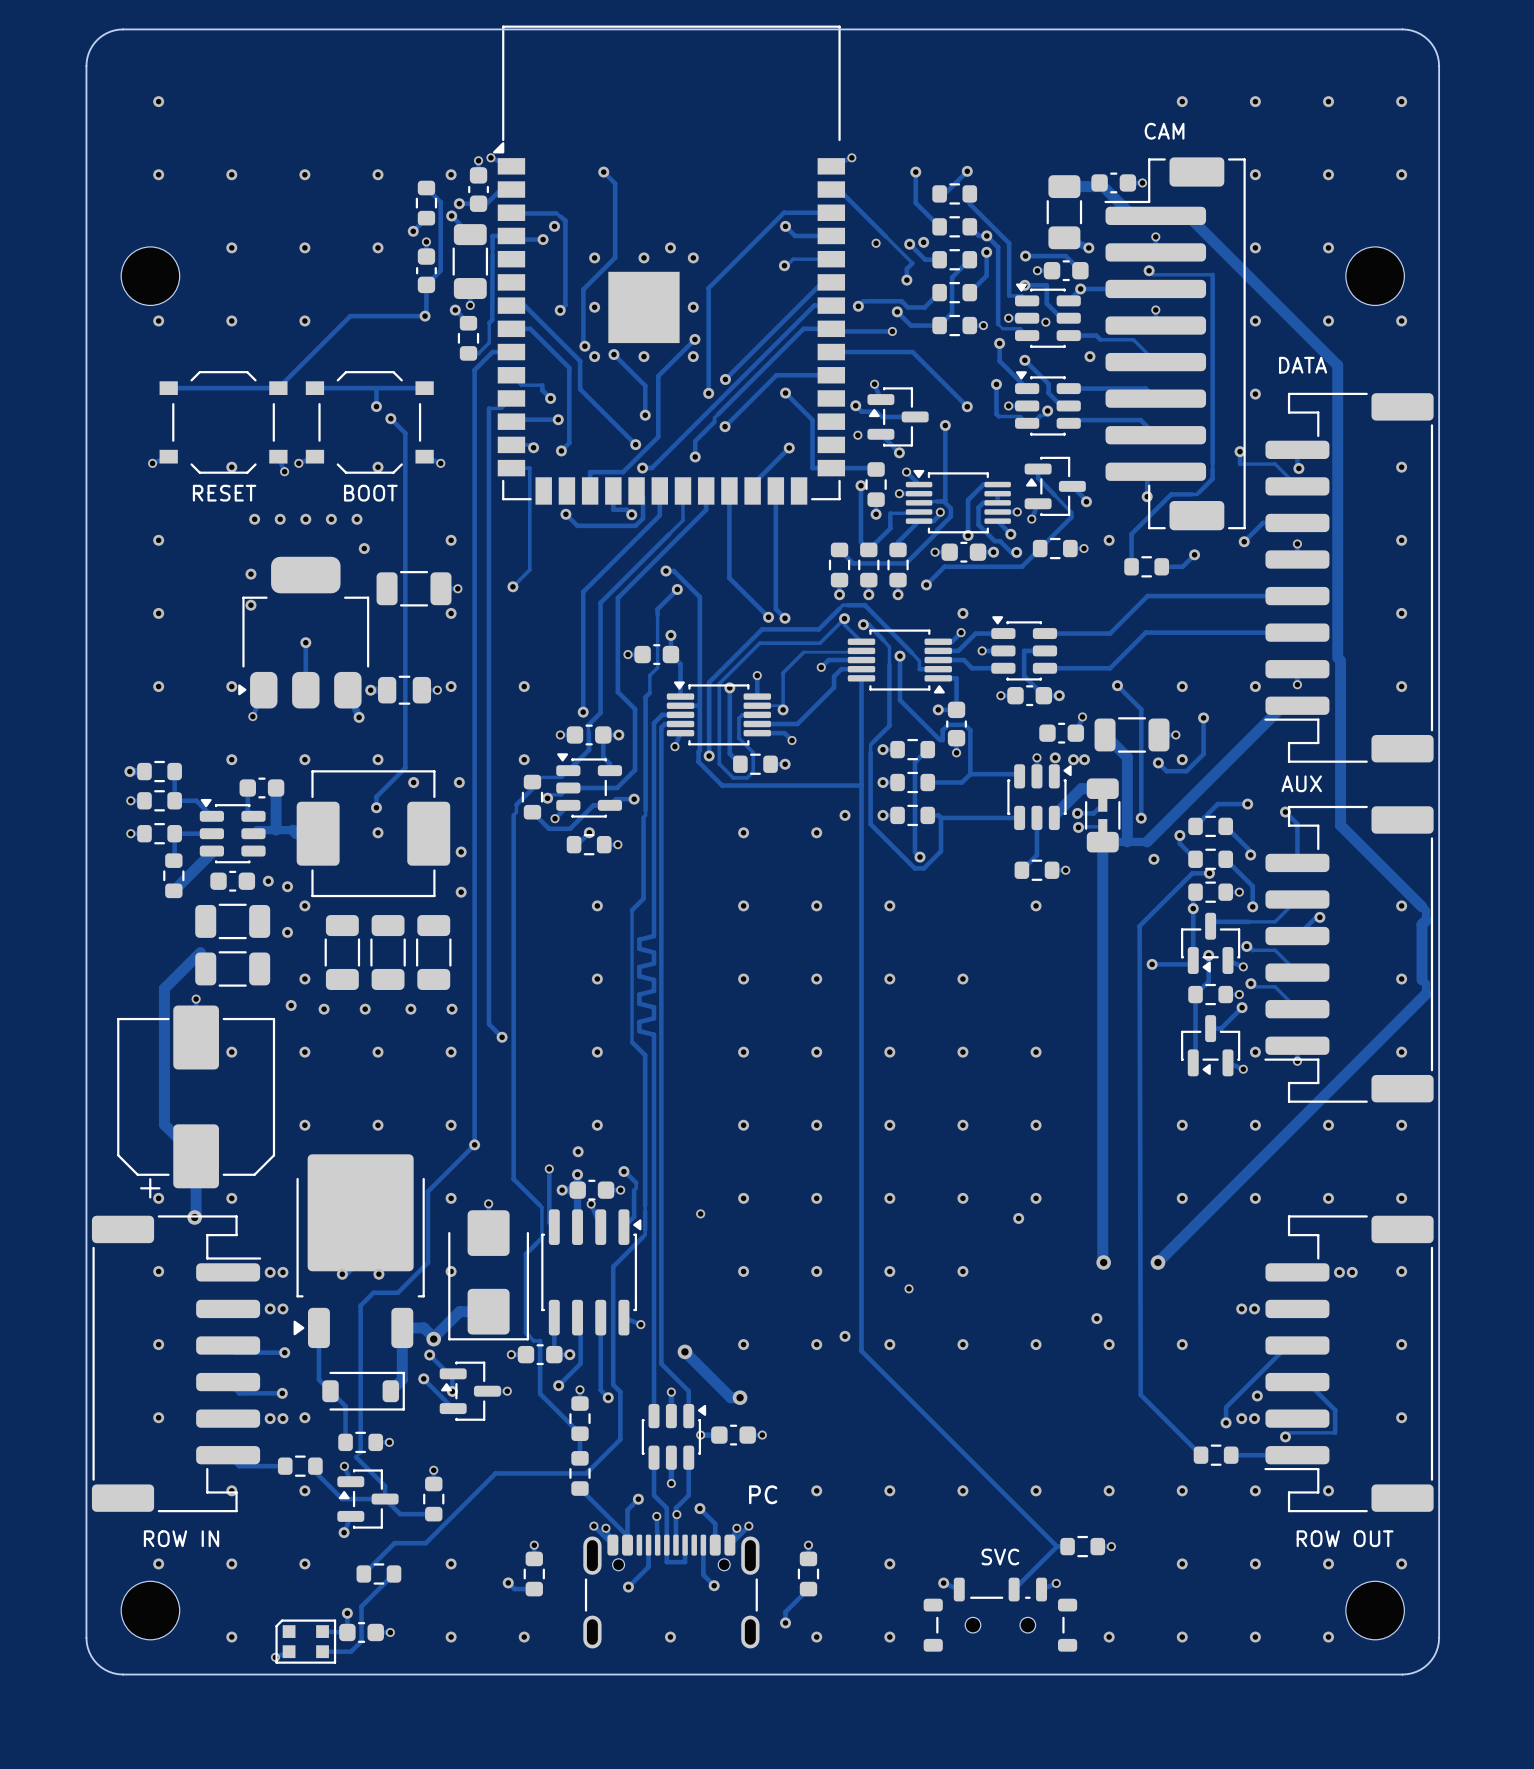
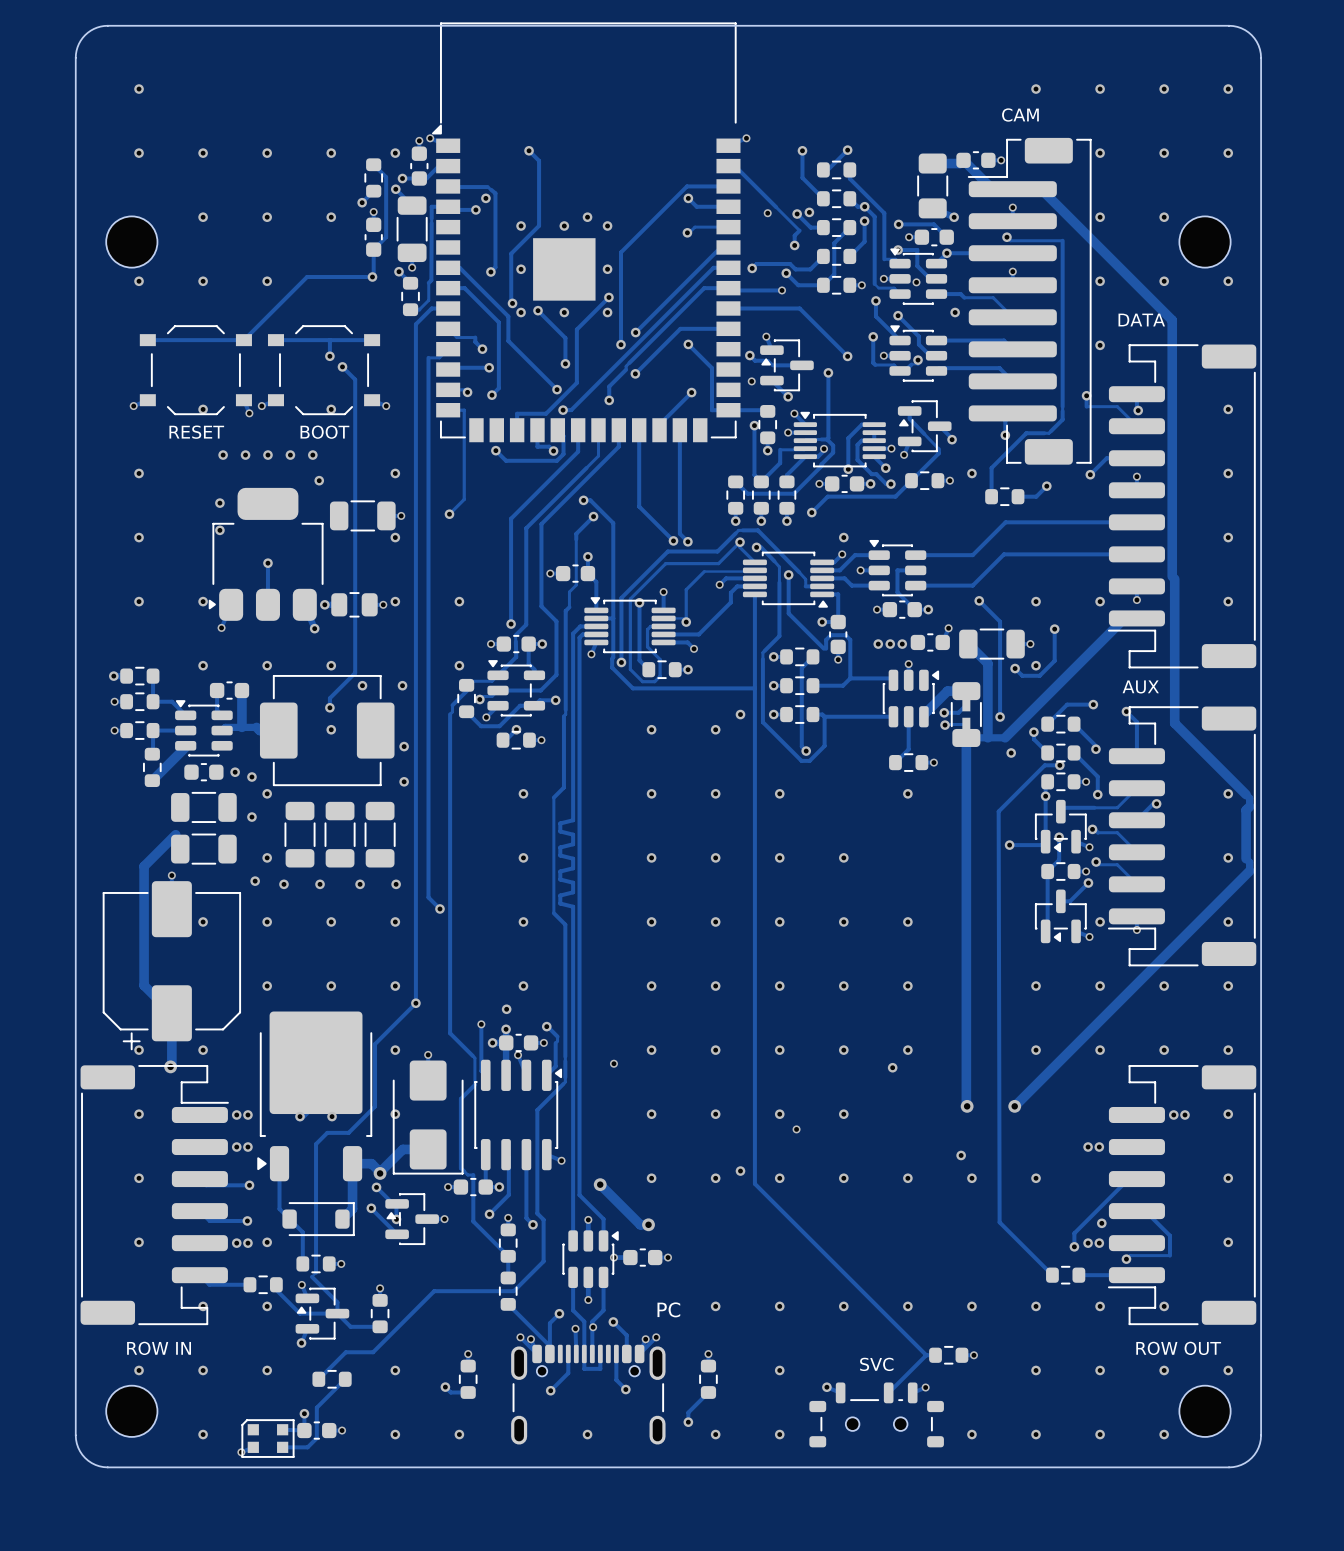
via: none -> (878, 644)
via: none -> (890, 644)
via: none -> (902, 644)
via: (1055, 757) -> none
via: (1073, 759) -> none
via: (1084, 759) -> none

